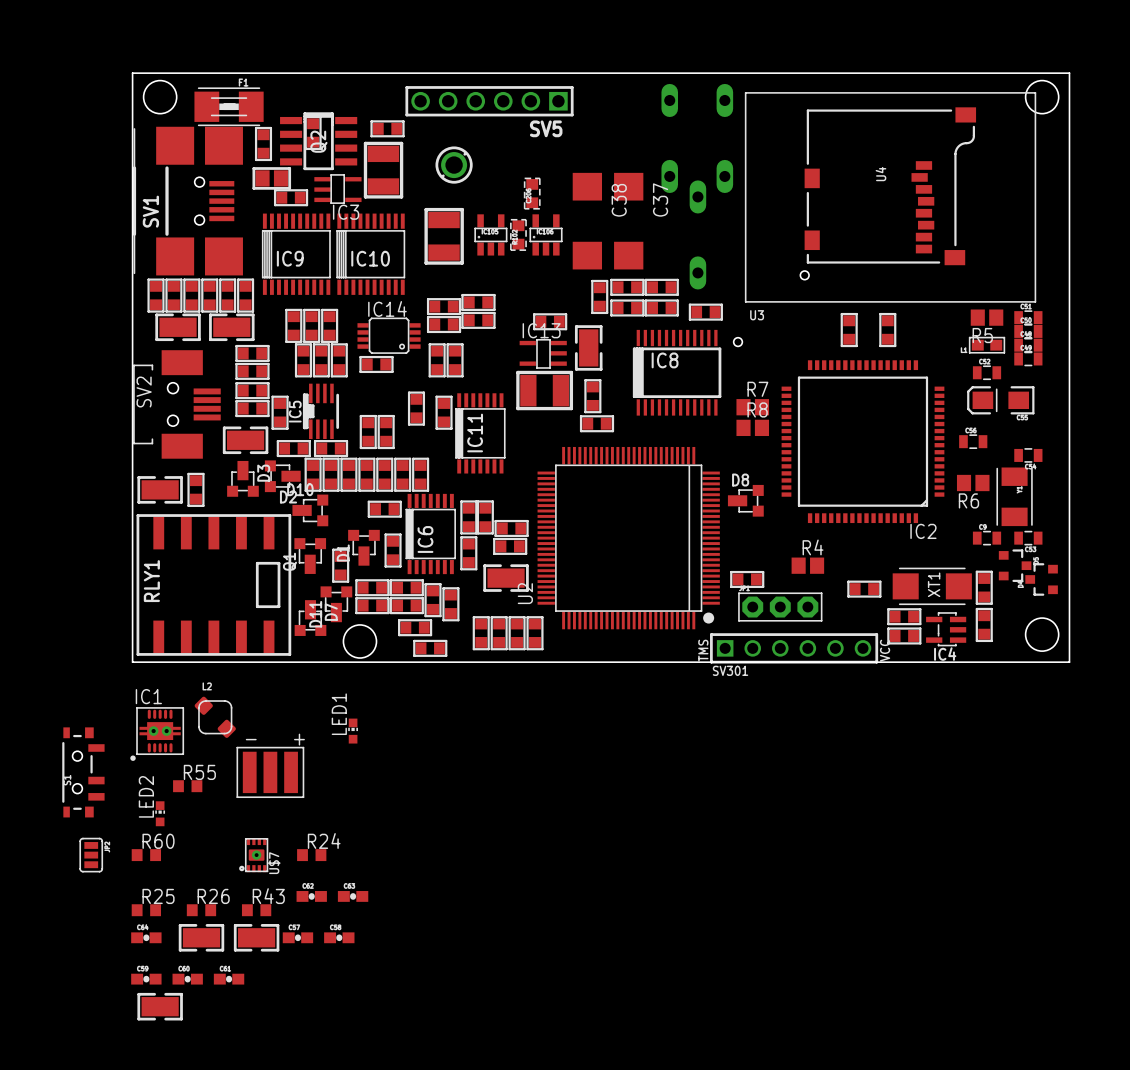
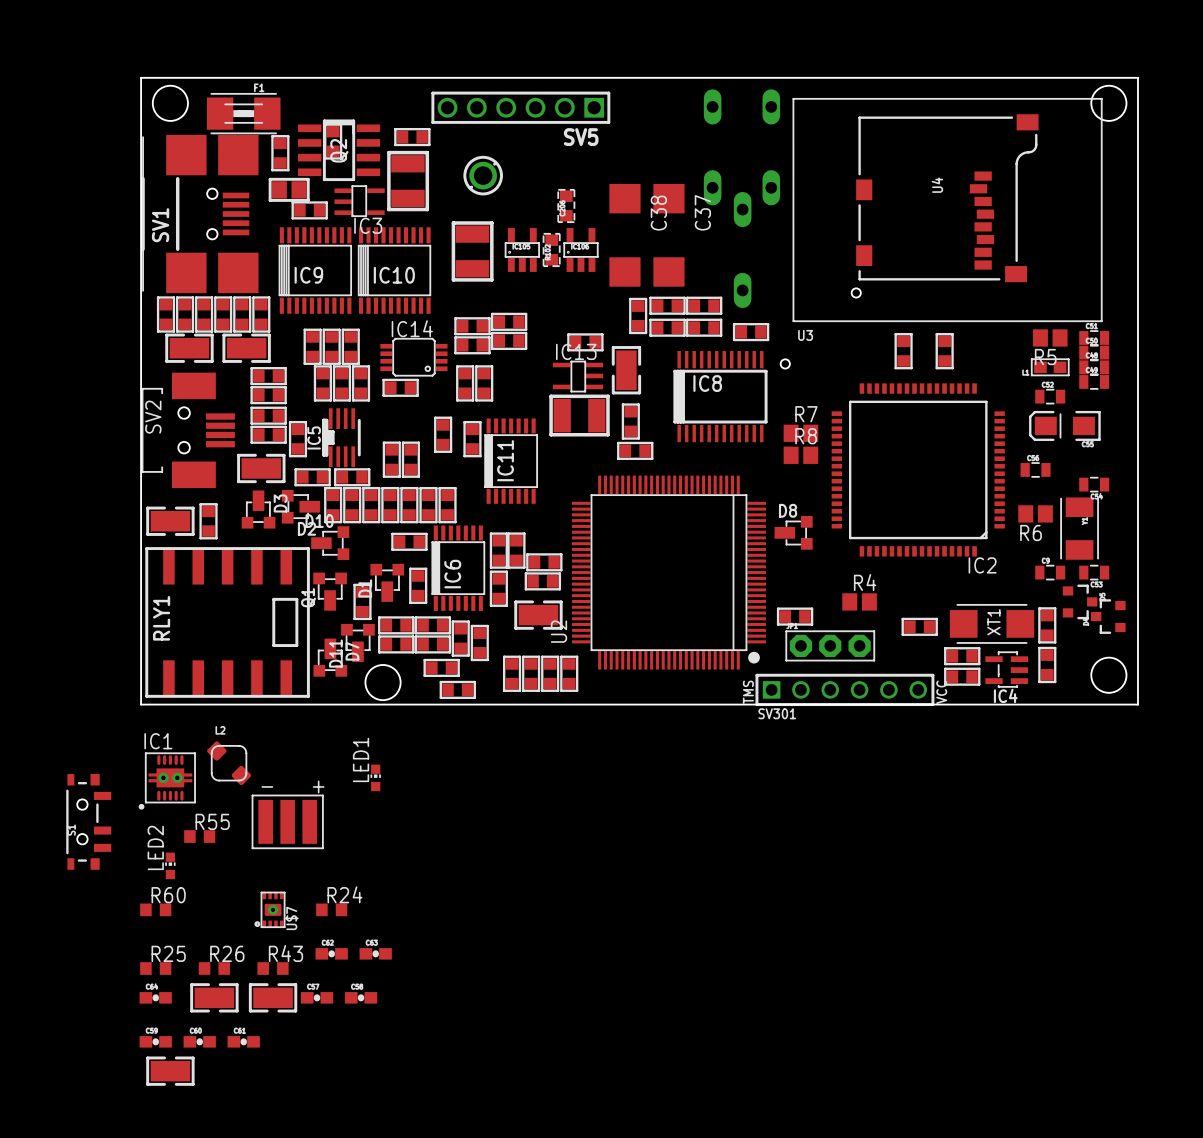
part: (91, 855) -> none

